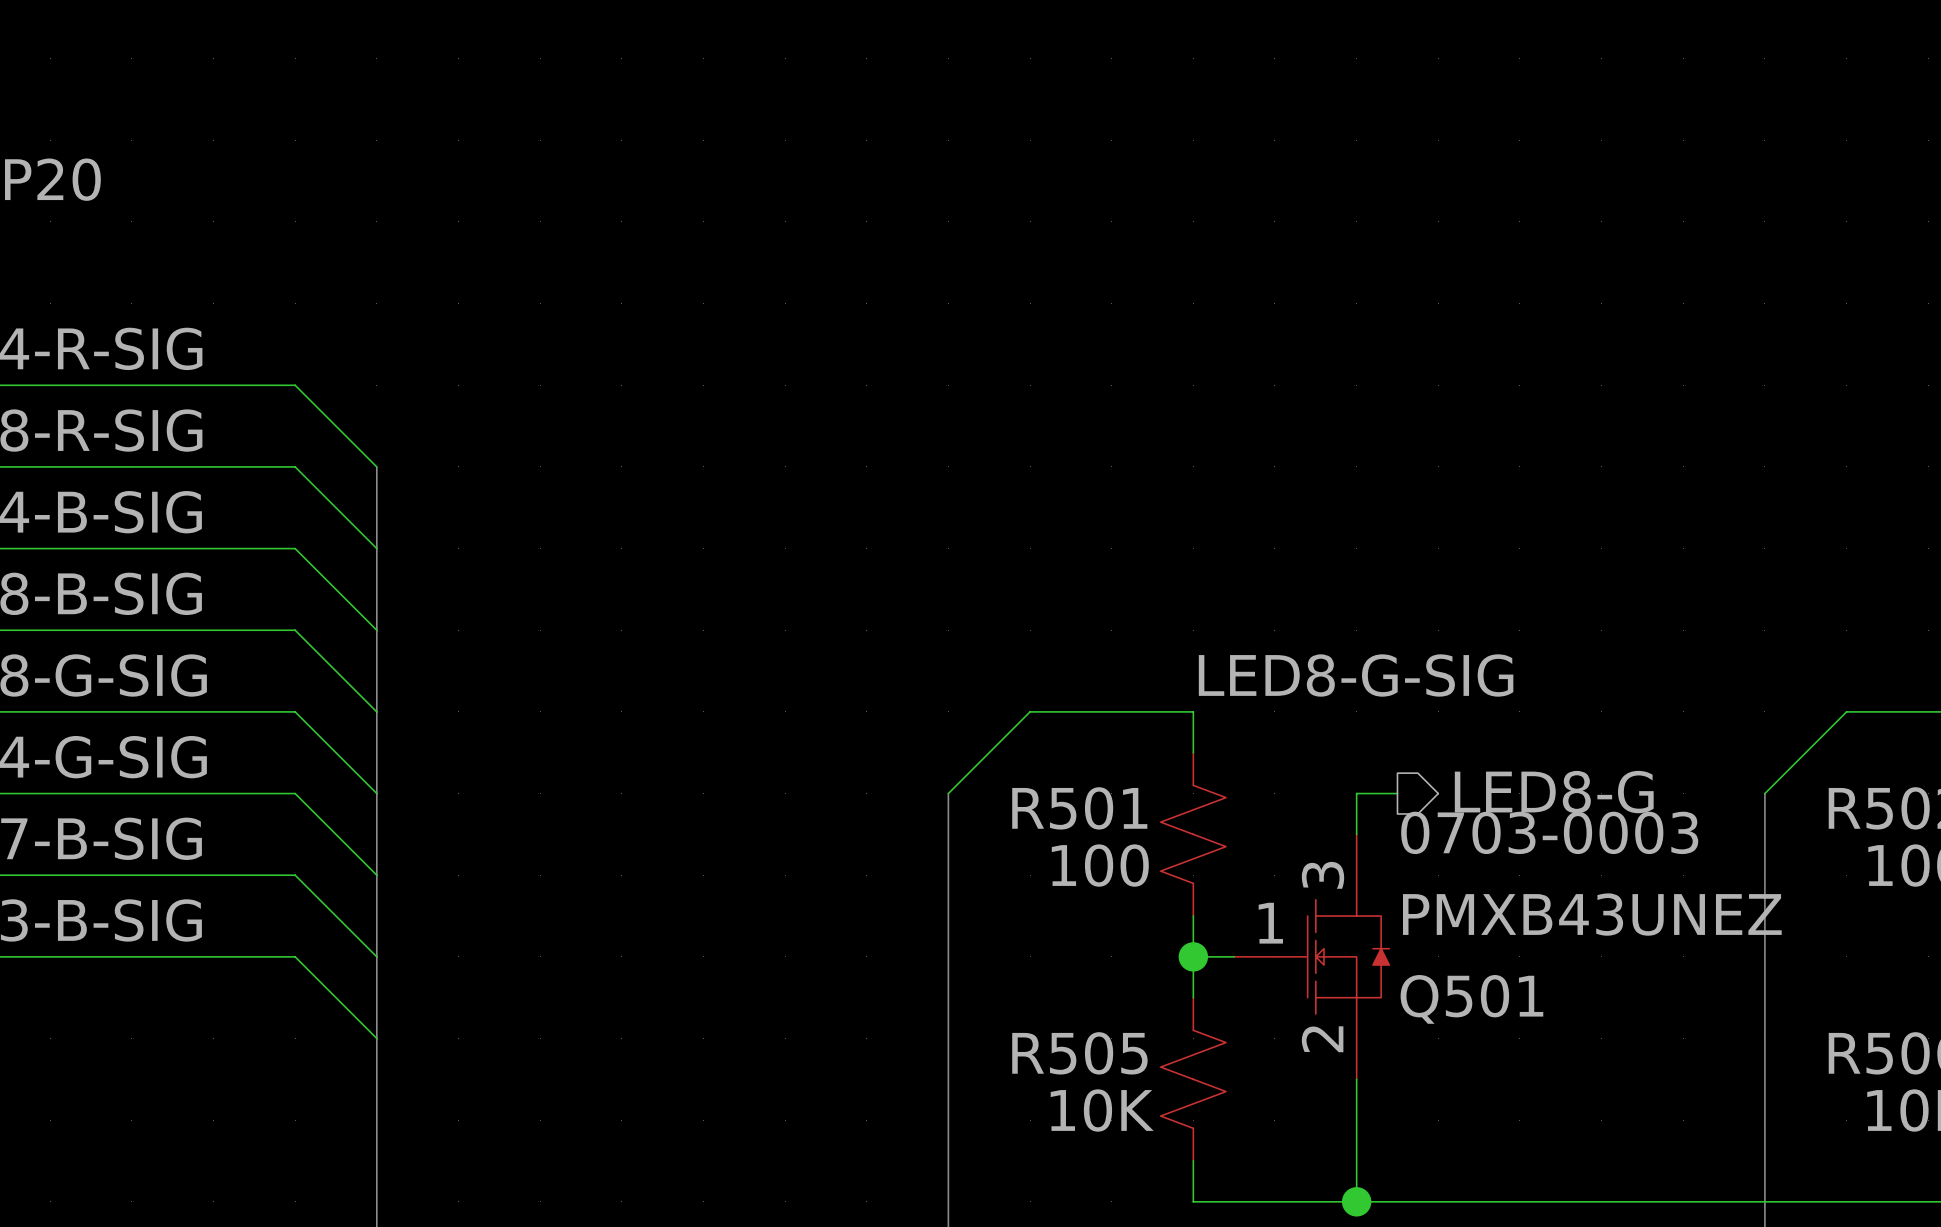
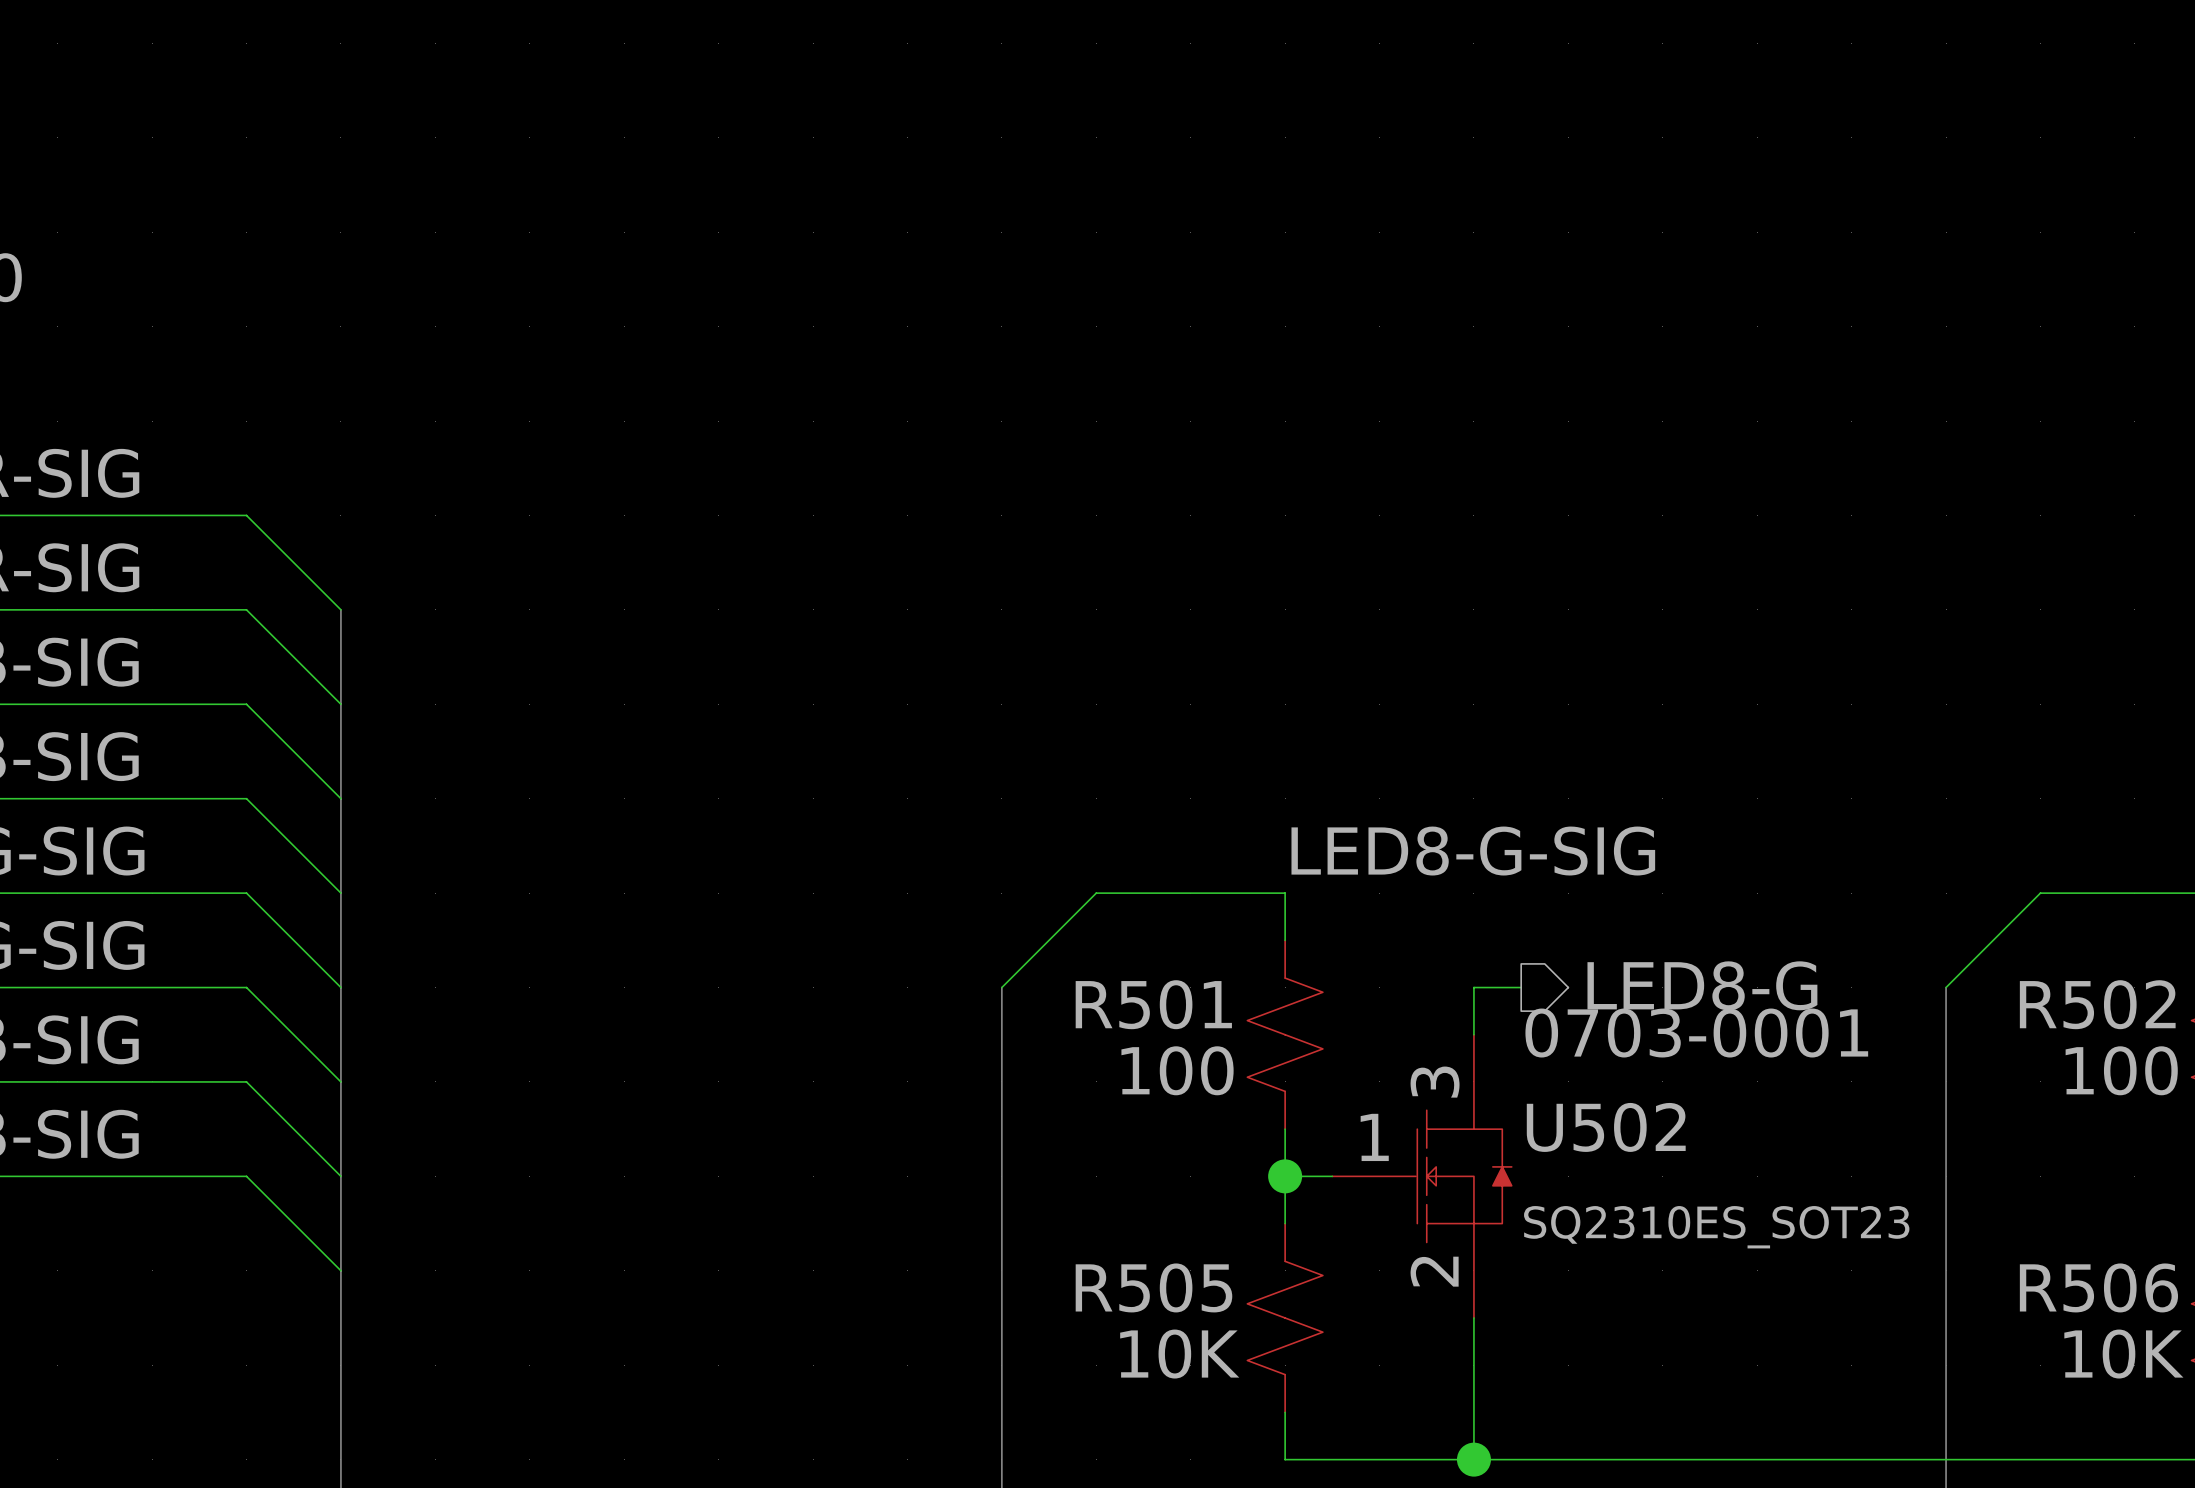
Q501 text: 0703-0003 (1549, 832) -> 0703-0001 (1696, 1033)
Q501 value: PMXB43UNEZ (1592, 914) -> SQ2310ES_SOT23 (1716, 1227)
Q501 name: Q501 (1471, 999) -> U502 (1606, 1127)

